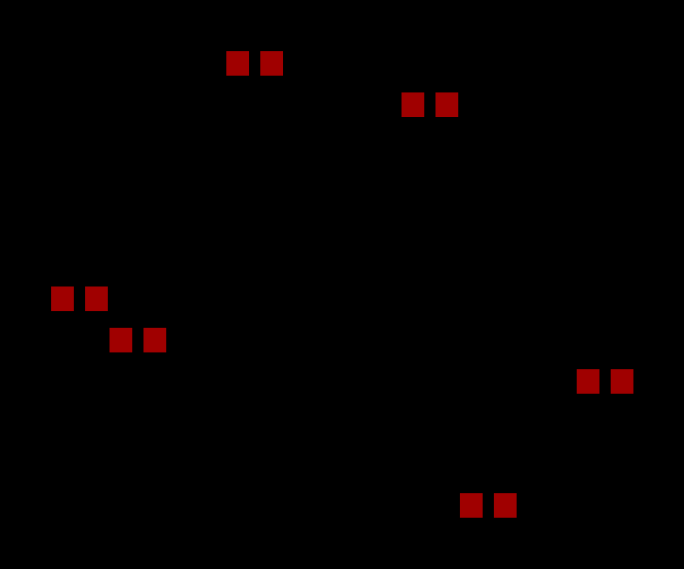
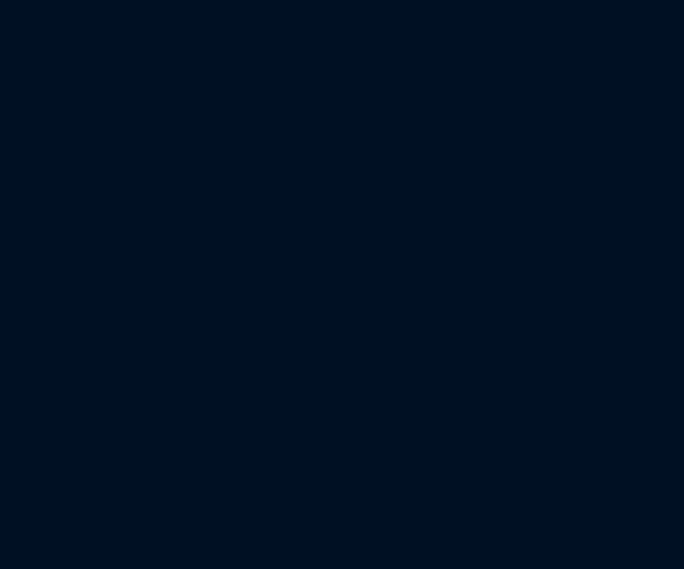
part: (254, 63) -> none
part: (429, 104) -> none
part: (79, 298) -> none
part: (137, 340) -> none
part: (605, 381) -> none
part: (488, 505) -> none

